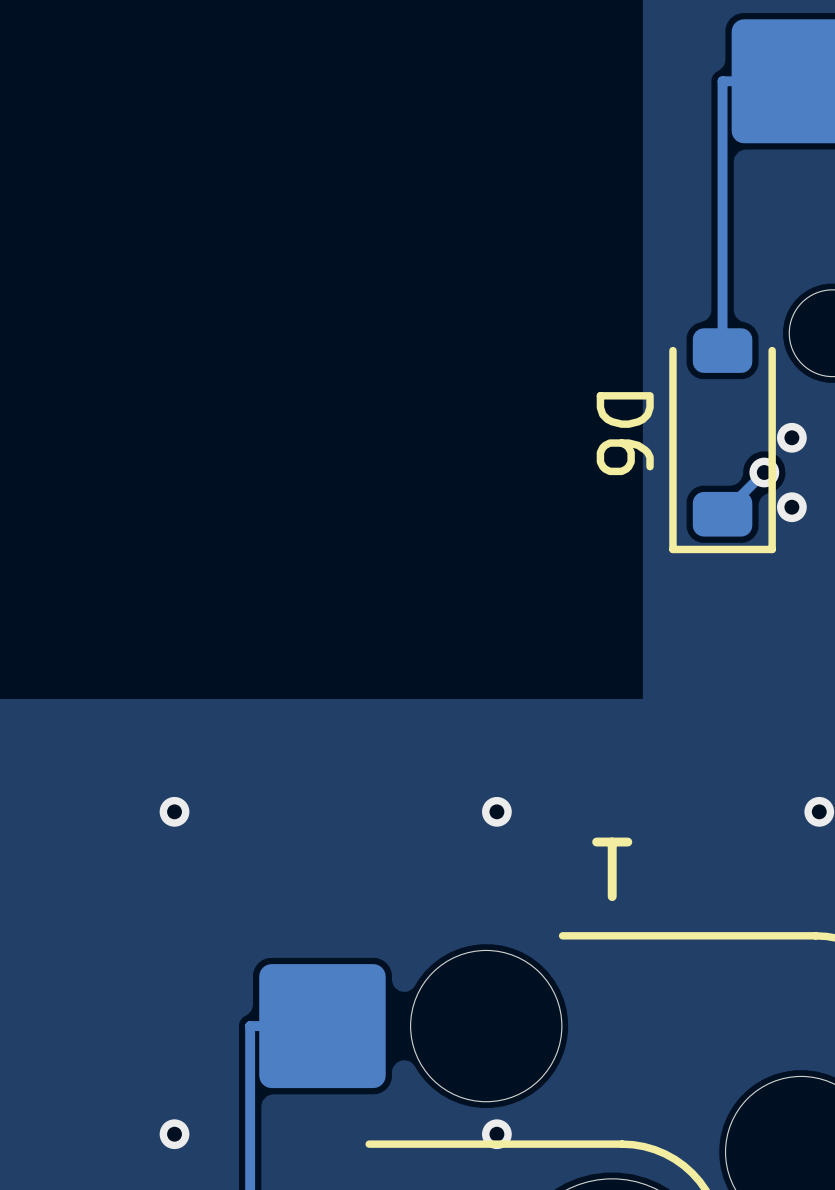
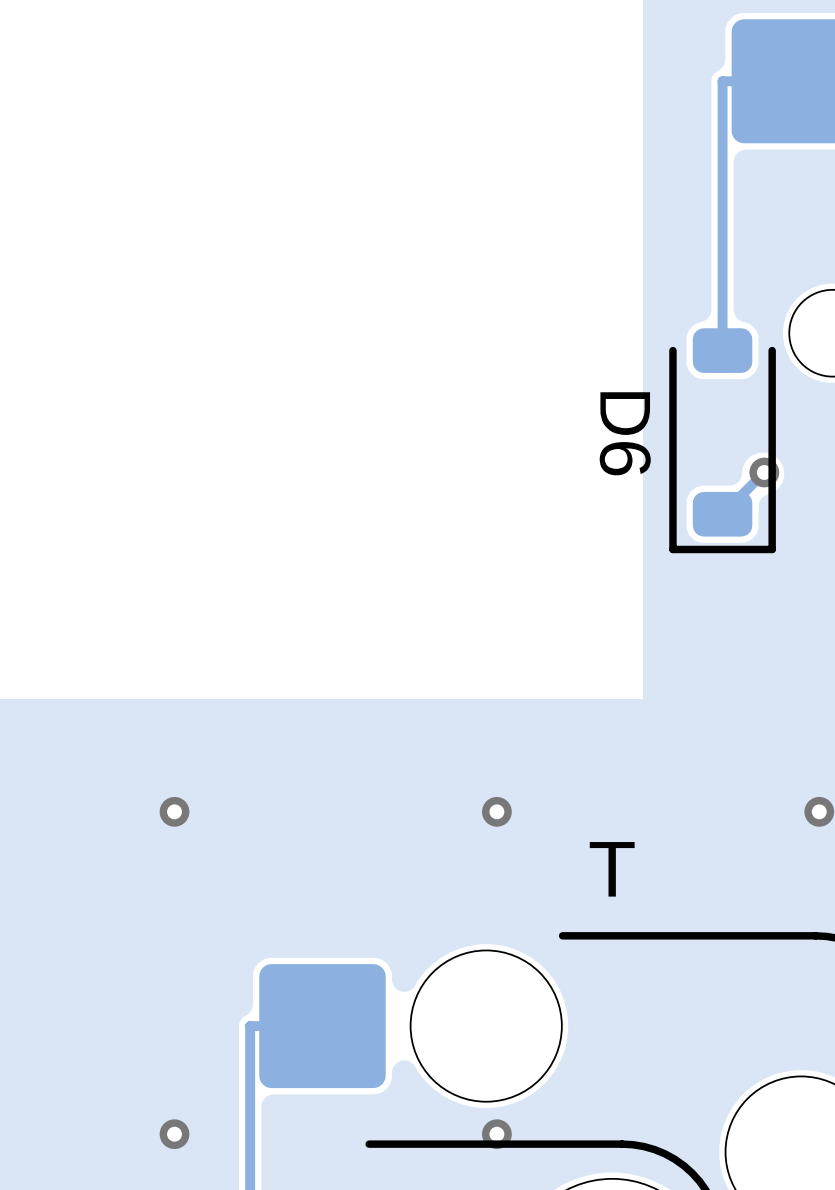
via: (791, 437) -> none
via: (791, 507) -> none

